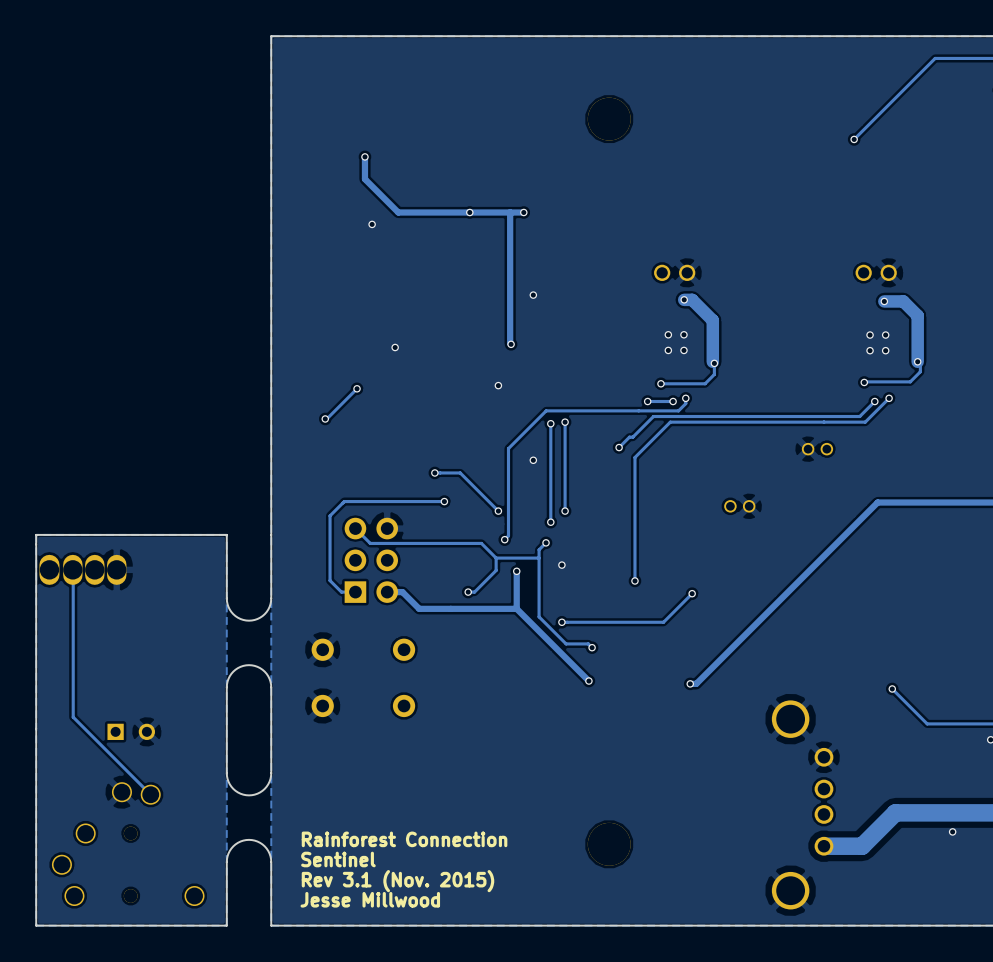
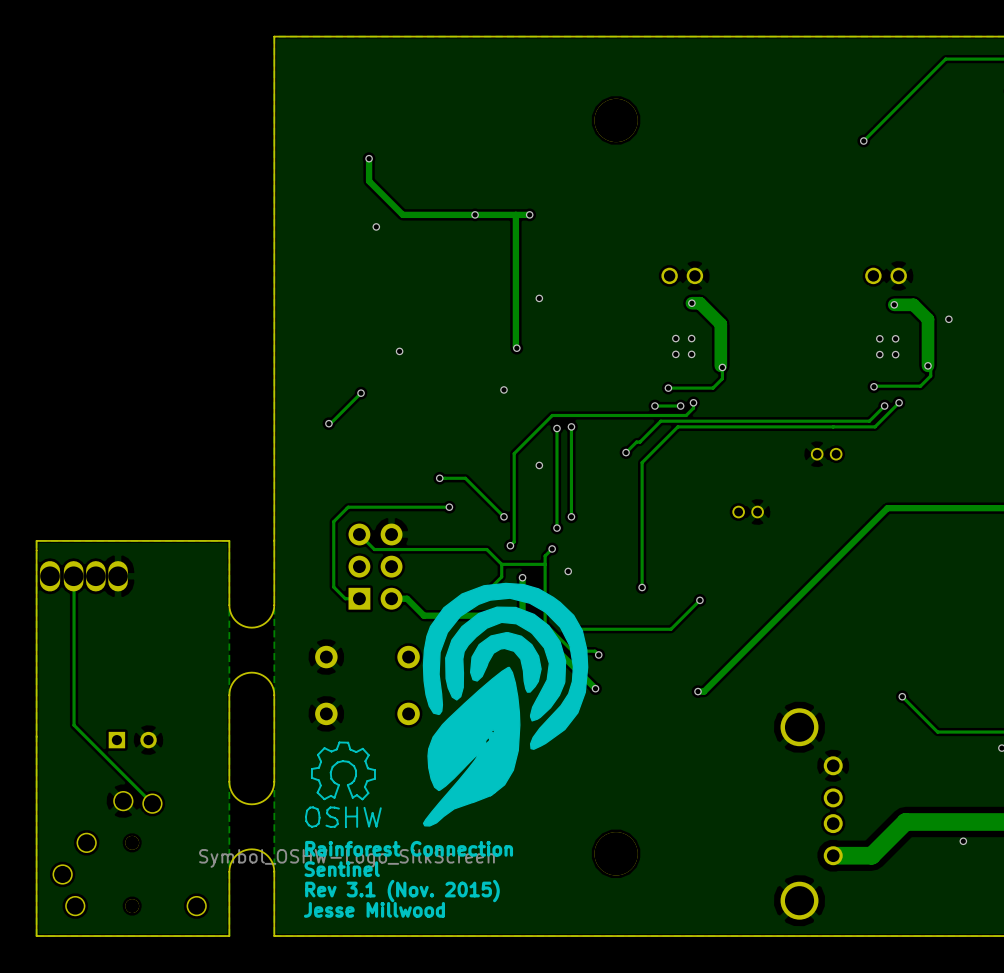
via: none -> (948, 319)
drawing: none -> [305, 582, 589, 829]

